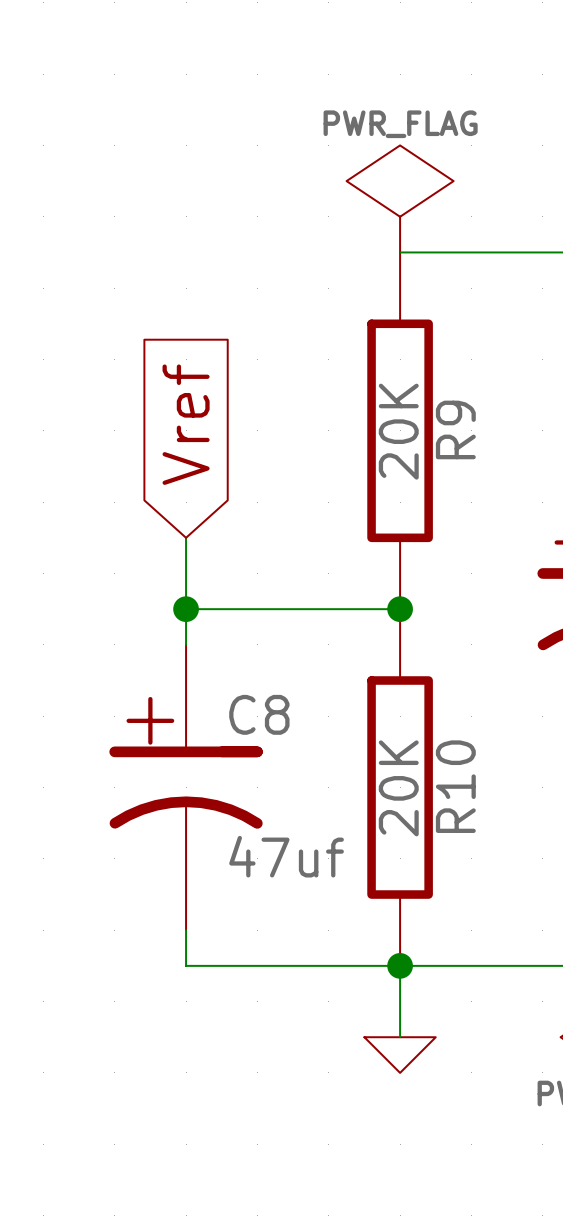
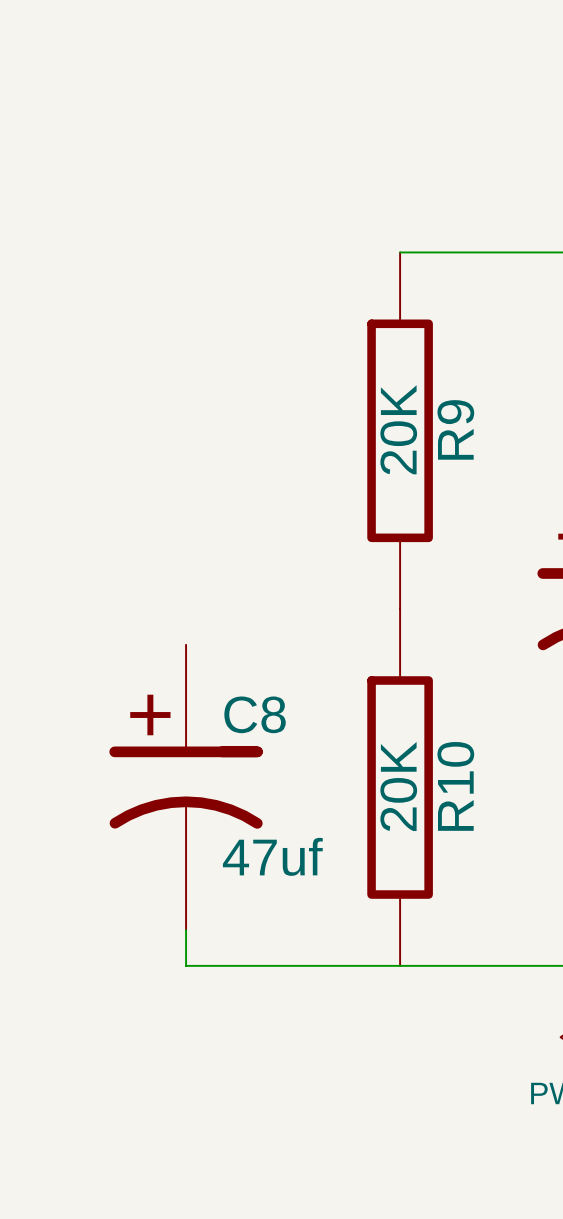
power symbol: PWR_FLAG (400, 198) -> none
global label: Vref (186, 424) -> none
wire: (186, 537) (186, 644) -> none
wire: (186, 609) (400, 609) -> none
junction: (186, 609) -> none
junction: (400, 609) -> none
wire: (400, 965) (400, 1037) -> none
junction: (400, 965) -> none
power symbol: (400, 1055) -> none

